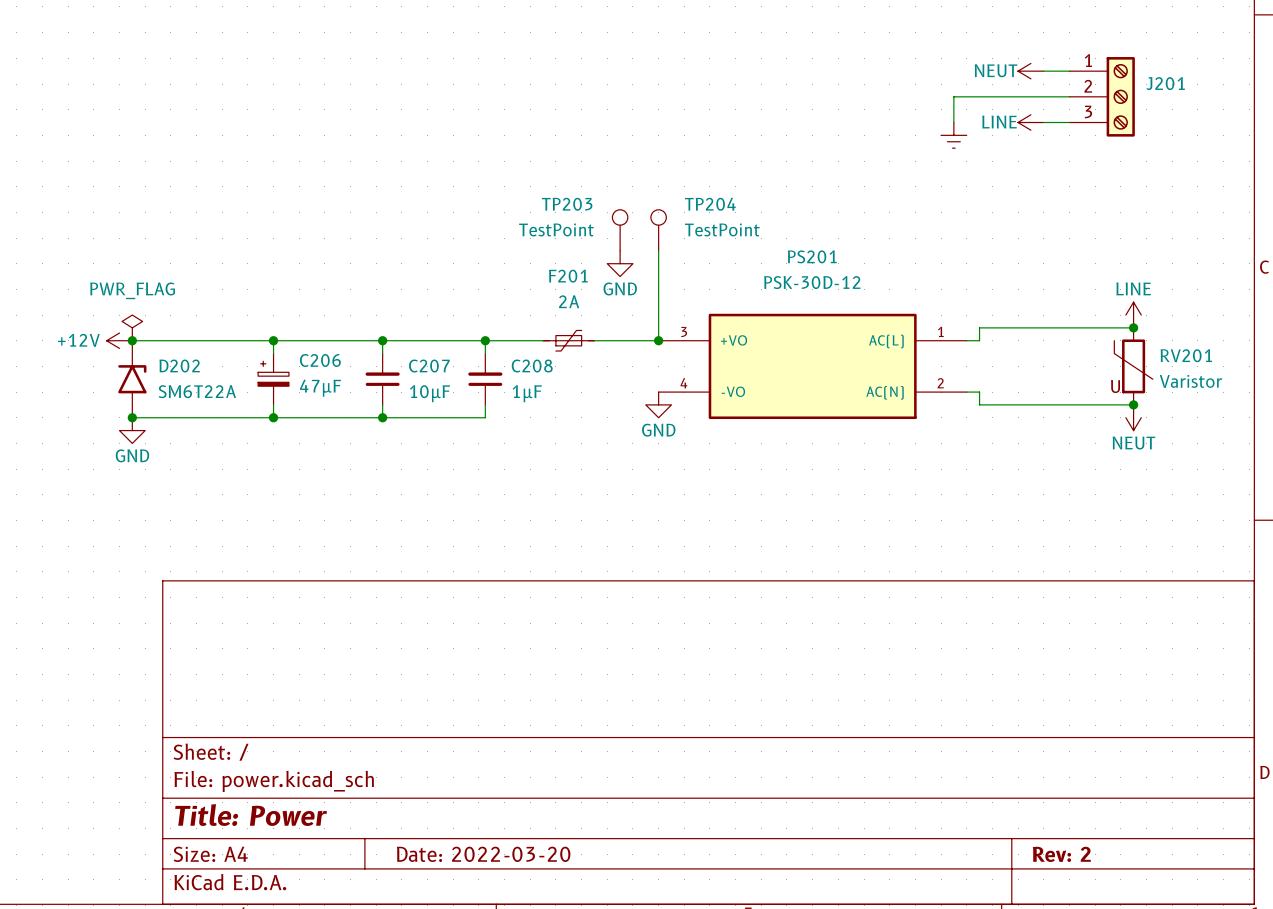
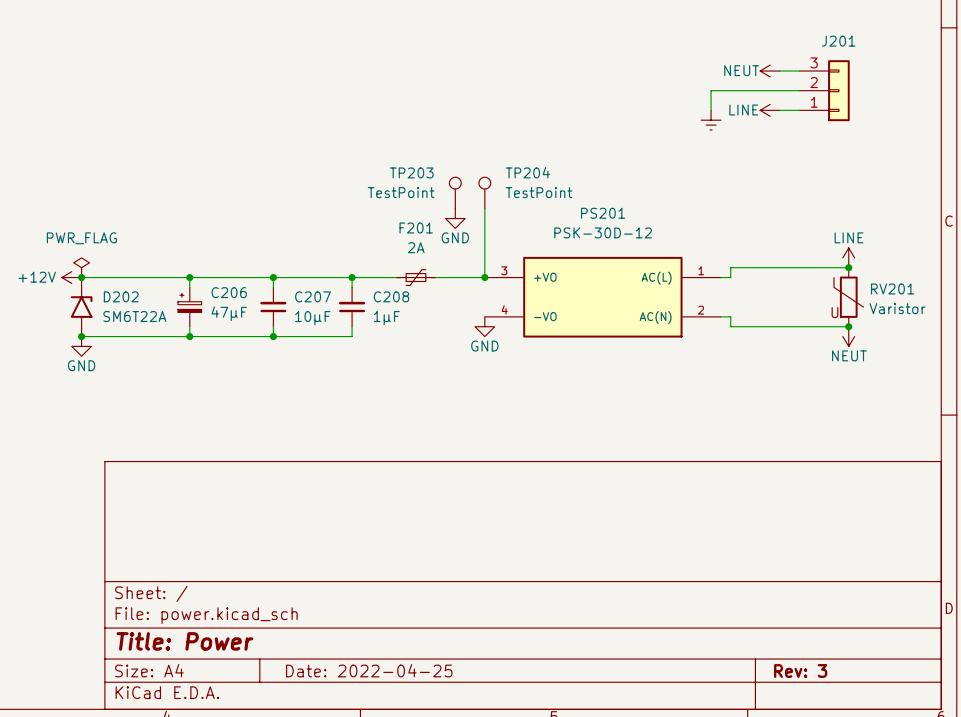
J201 symbol: [1069, 57, 1135, 137] -> [799, 60, 850, 122]
J201 name position: J201 (1165, 83) -> J201 (838, 41)
title block: Date: 2022-03-20 (483, 854) -> Date: 2022-04-25 (369, 670)
title block: Rev: 2 (1061, 854) -> Rev: 3 (800, 670)

